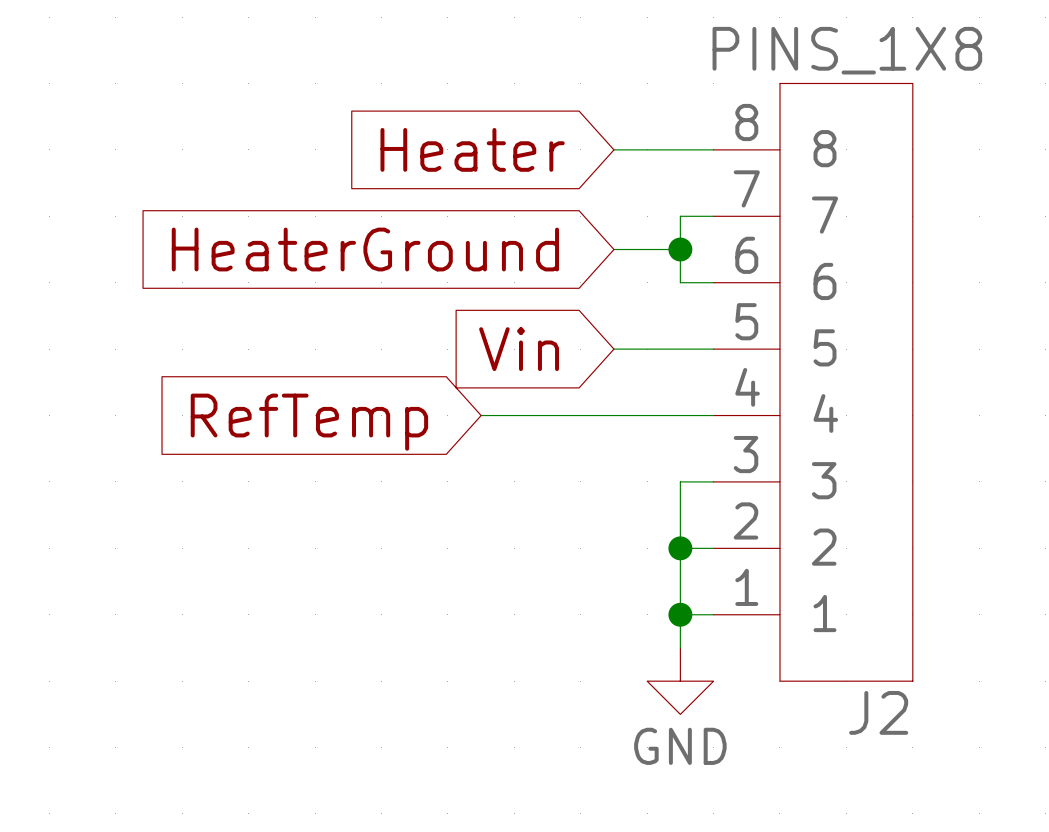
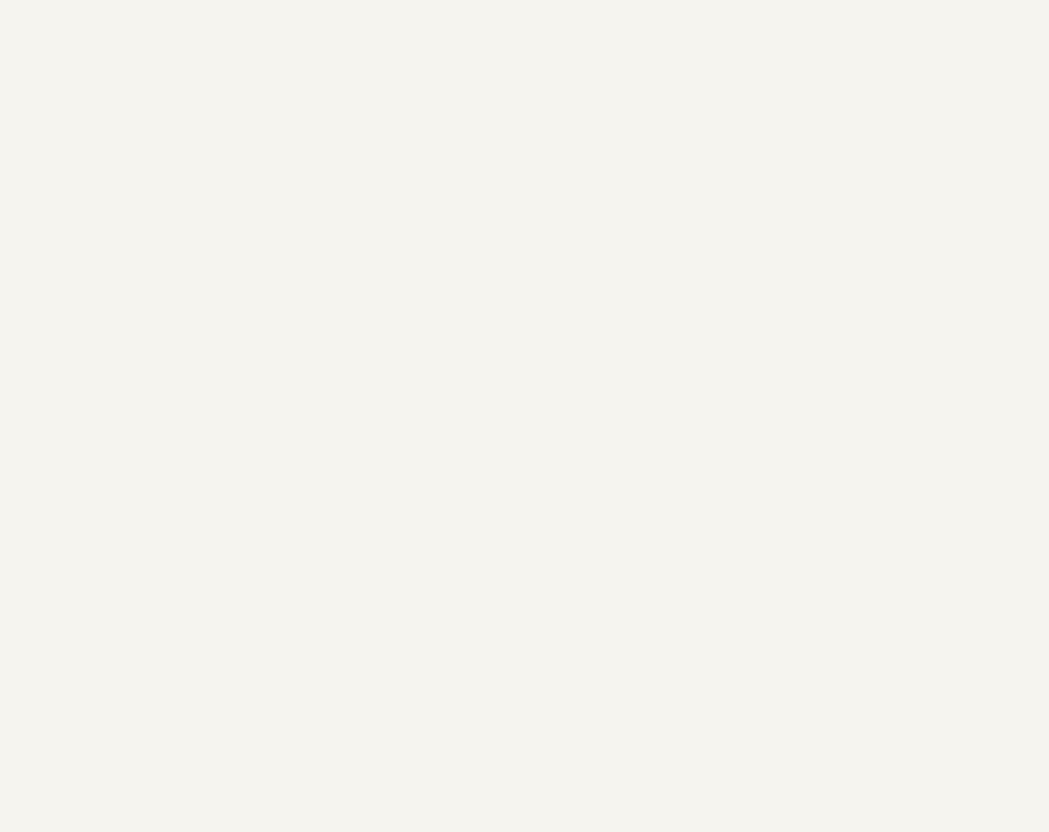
global label: Heater (472, 149) -> none
wire: (613, 149) (713, 149) -> none
wire: (713, 216) (680, 216) (680, 282) (713, 282) -> none
global label: HeaterGround (365, 249) -> none
wire: (613, 249) (680, 249) -> none
junction: (680, 249) -> none
global label: Vin (519, 349) -> none
wire: (613, 349) (713, 349) -> none
J2: PINS_1X8 (813, 382) -> none
wire: (481, 415) (713, 415) -> none
global label: RefTemp (309, 422) -> none
wire: (713, 481) (680, 481) (680, 647) -> none
wire: (680, 548) (713, 548) -> none
junction: (680, 548) -> none
wire: (680, 614) (713, 614) -> none
junction: (680, 614) -> none
power symbol: GND (680, 681) -> none

